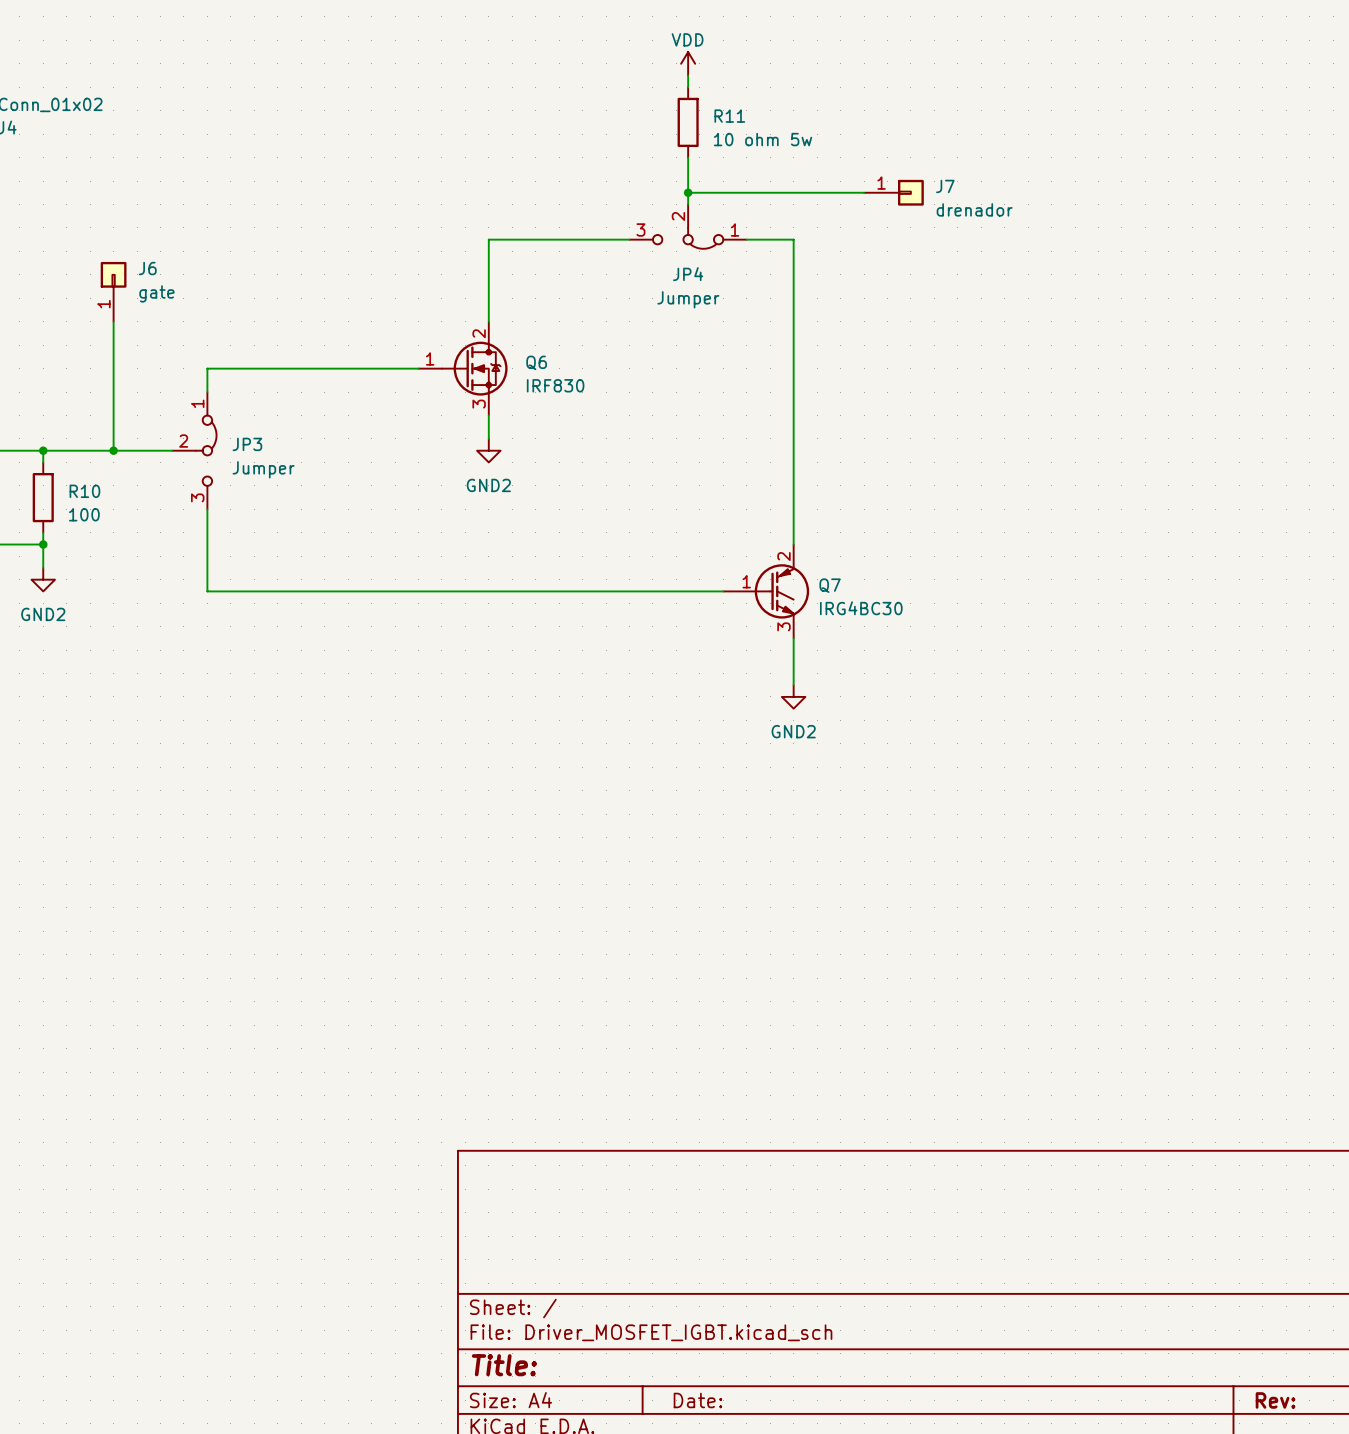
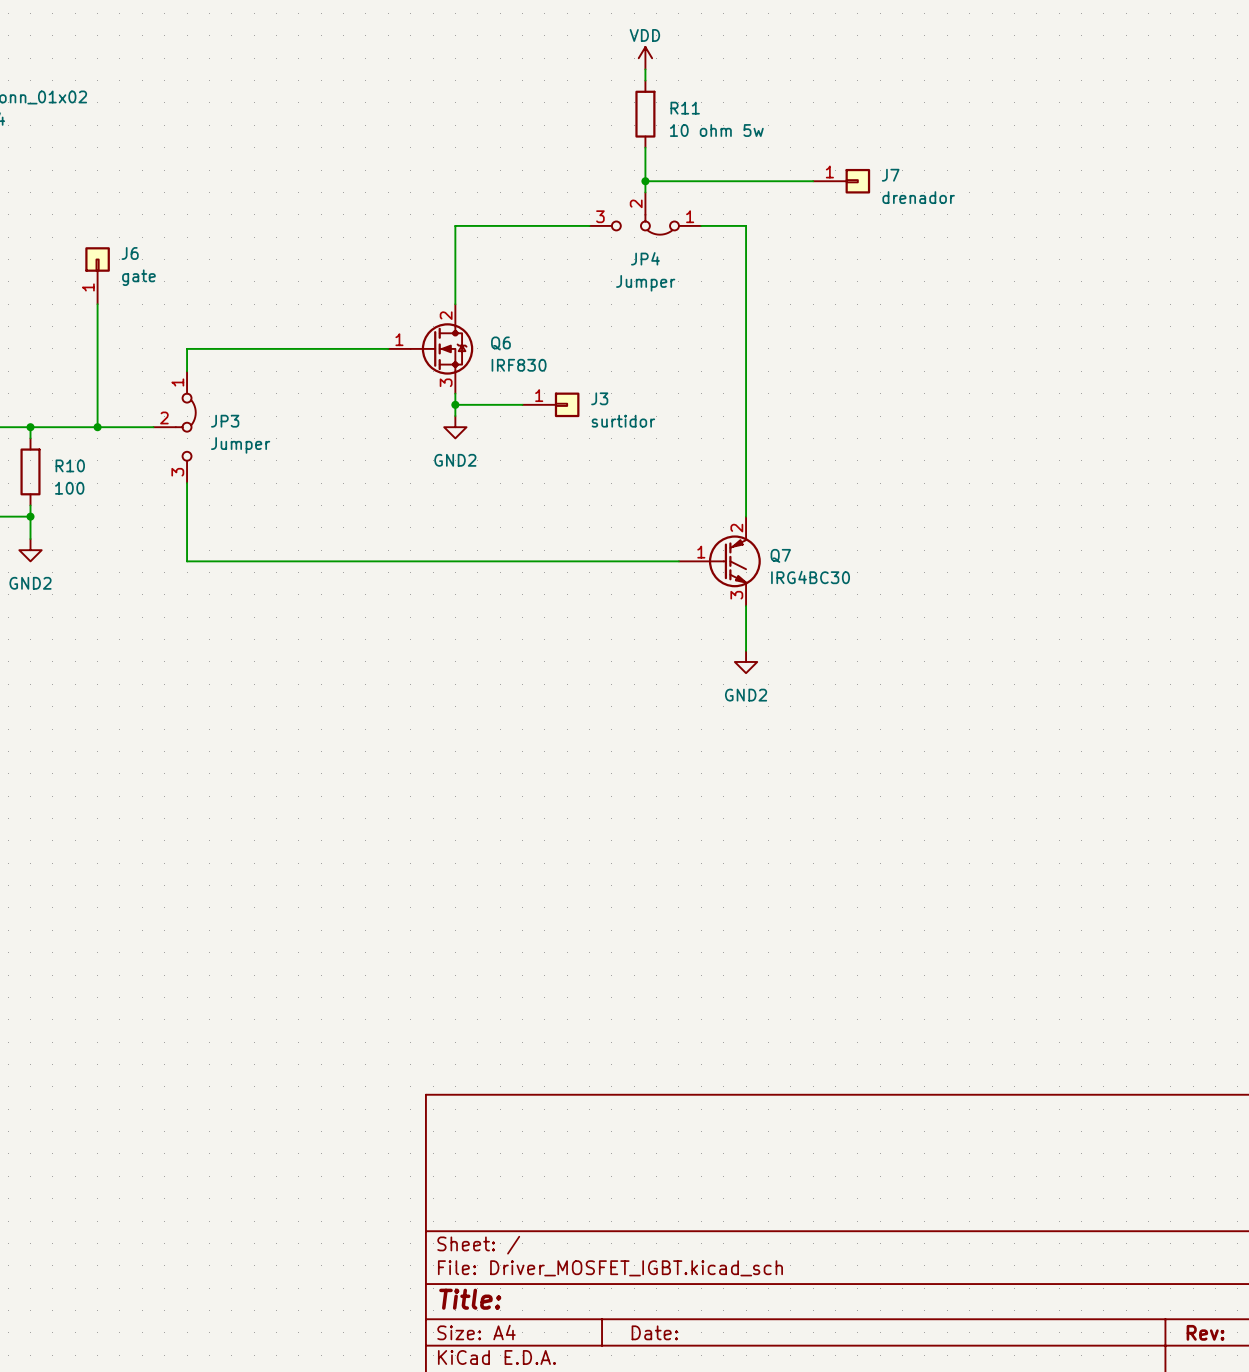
wire: none -> (455, 404) (522, 404)
junction: none -> (455, 404)
J3: none -> surtidor (550, 404)

